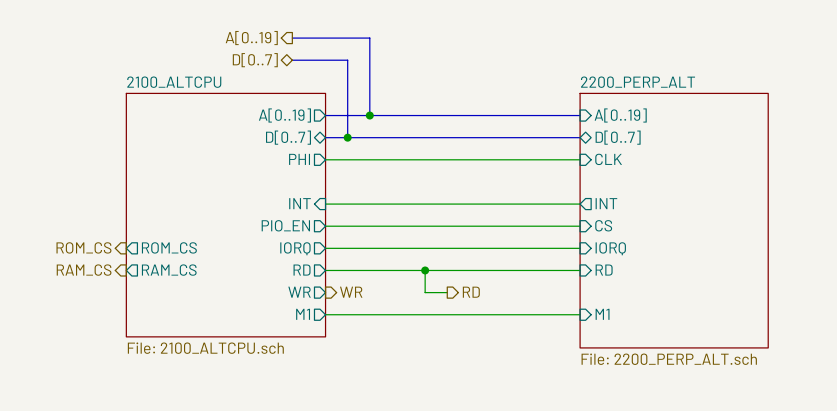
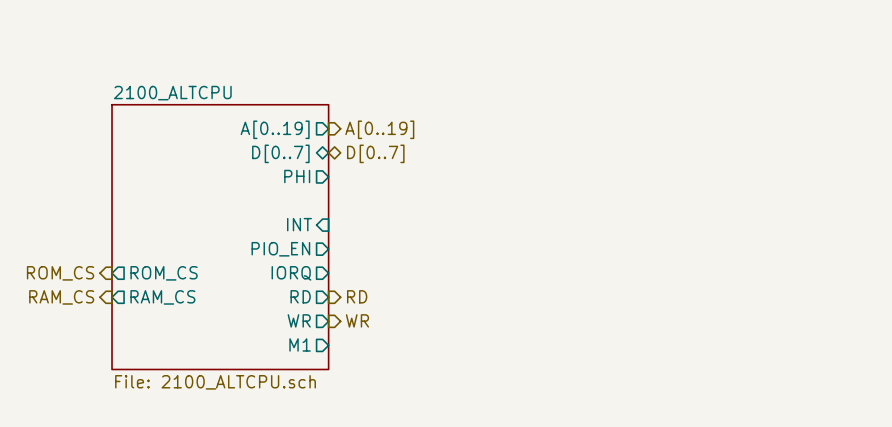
hierarchical label rotation: 0° (251, 38) -> 180° (379, 129)
hierarchical label position: A[0..19] (251, 38) -> A[0..19] (379, 129)
bus: (292, 38) (369, 38) (369, 115) -> none
hierarchical label rotation: 0° (255, 60) -> 180° (375, 153)
hierarchical label position: D[0..7] (255, 60) -> D[0..7] (375, 153)
bus: (292, 60) (347, 60) (347, 137) -> none
bus: (325, 115) (580, 115) -> none
junction: (369, 115) -> none
sheet pin: A[0..19] (620, 115) -> none
bus: (325, 137) (580, 137) -> none
junction: (347, 137) -> none
sheet pin: D[0..7] (618, 137) -> none
wire: (325, 159) (580, 159) -> none
sheet pin: CLK (608, 159) -> none
sheet pin: INT (606, 203) -> none
wire: (325, 204) (580, 204) -> none
sheet 2200_PERP_ALT: File: 2200_PERP_ALT.sch (674, 220) -> none
sheet pin: CS (603, 225) -> none
wire: (325, 226) (580, 226) -> none
wire: (325, 248) (580, 248) -> none
sheet pin: IORQ (610, 248) -> none
wire: (325, 270) (580, 270) -> none
wire: (425, 270) (425, 292) (447, 292) -> none
junction: (425, 270) -> none
sheet pin: RD (604, 270) -> none
hierarchical label position: RD (471, 292) -> RD (357, 296)
wire: (325, 314) (580, 314) -> none
sheet pin: M1 (602, 314) -> none

